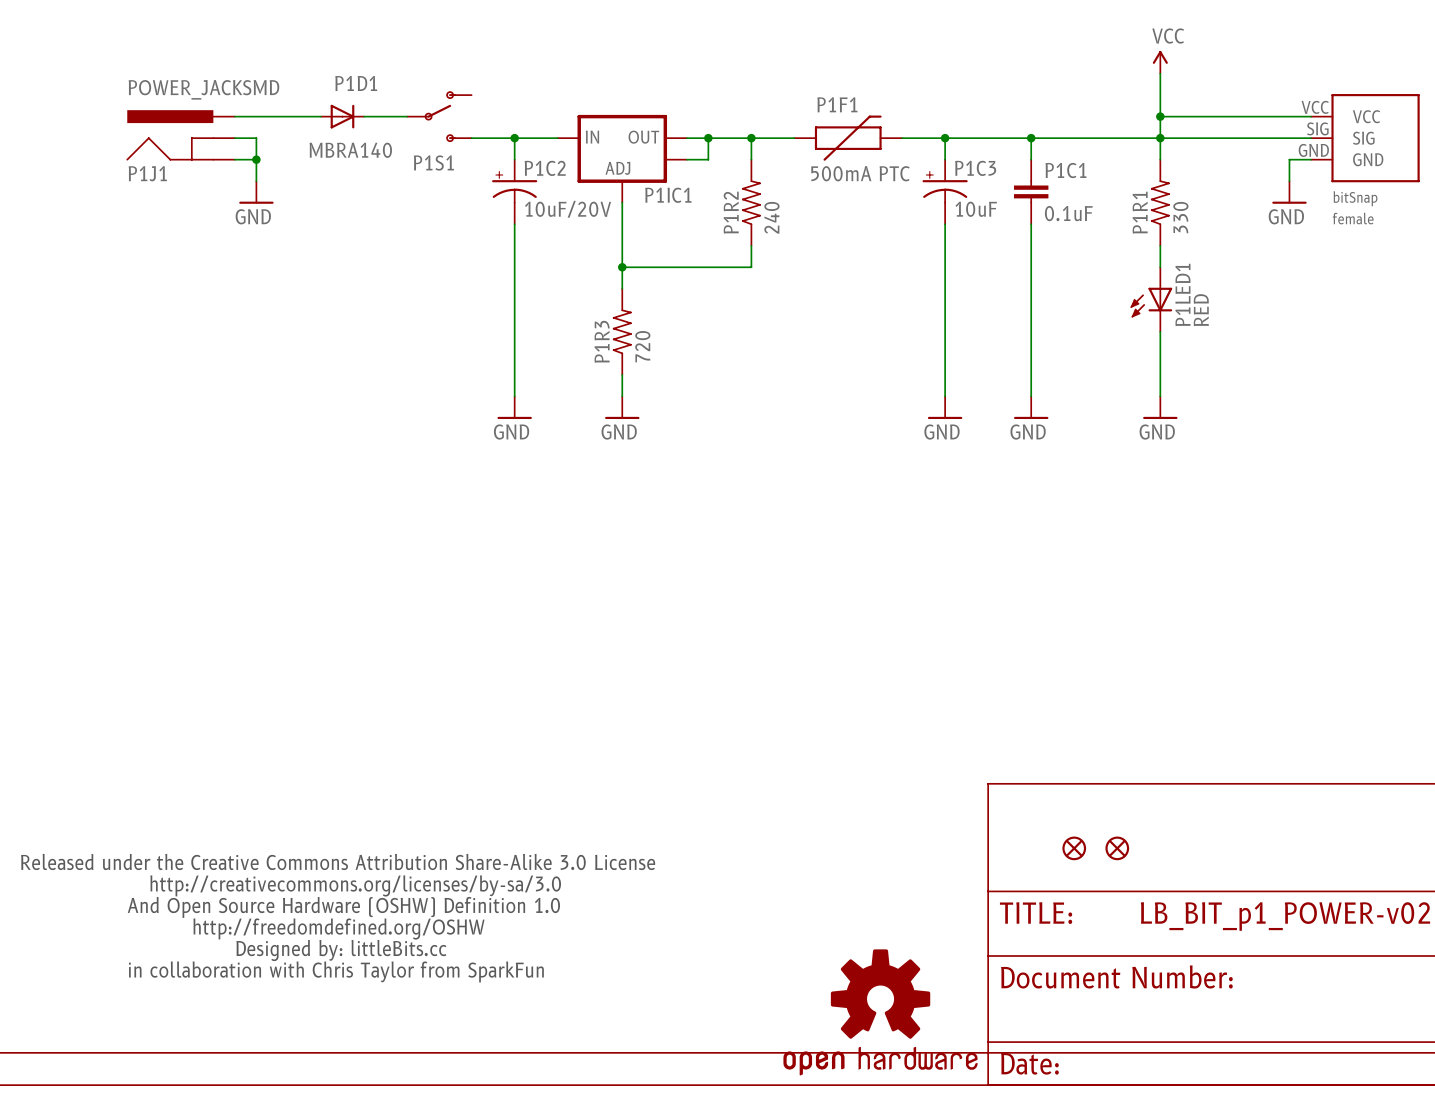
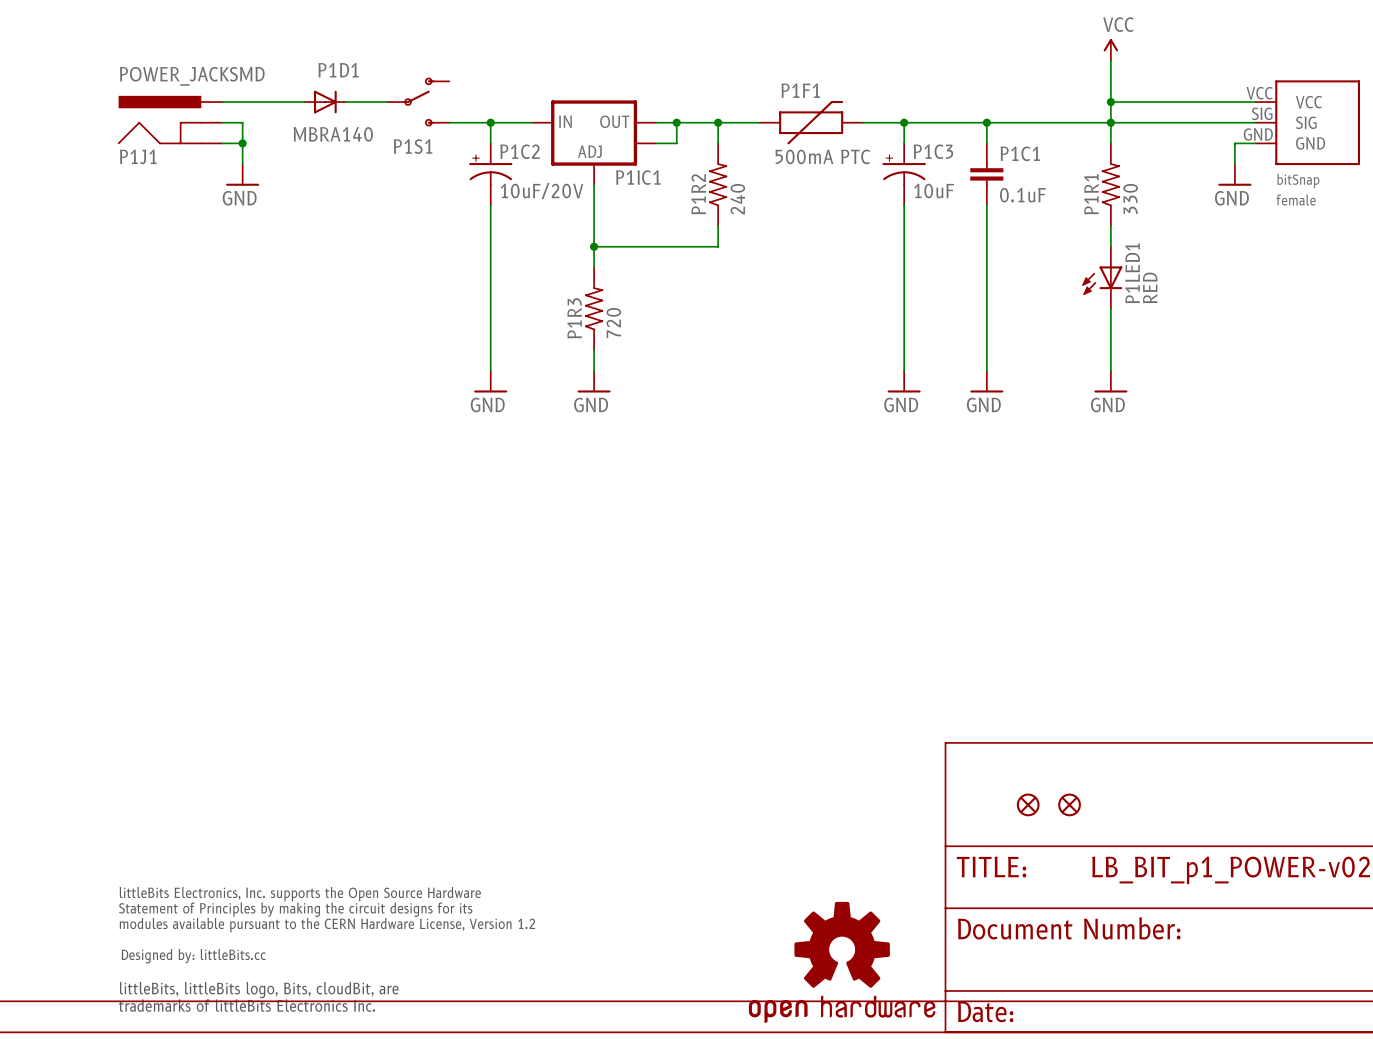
part: (338, 918) -> none
part: none -> (327, 949)

